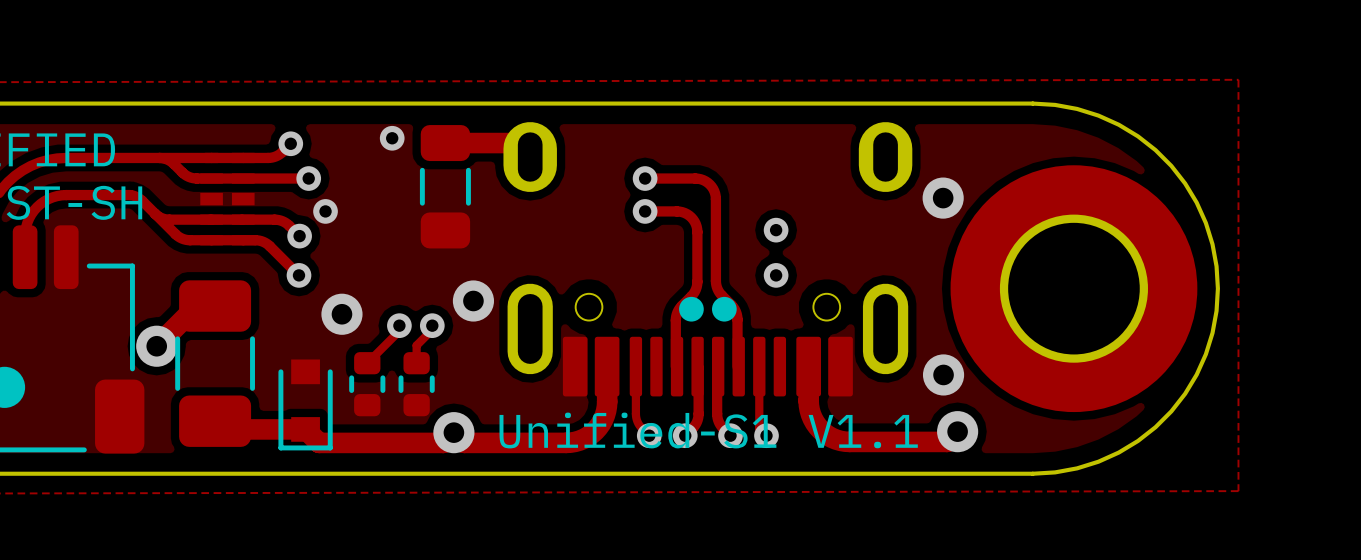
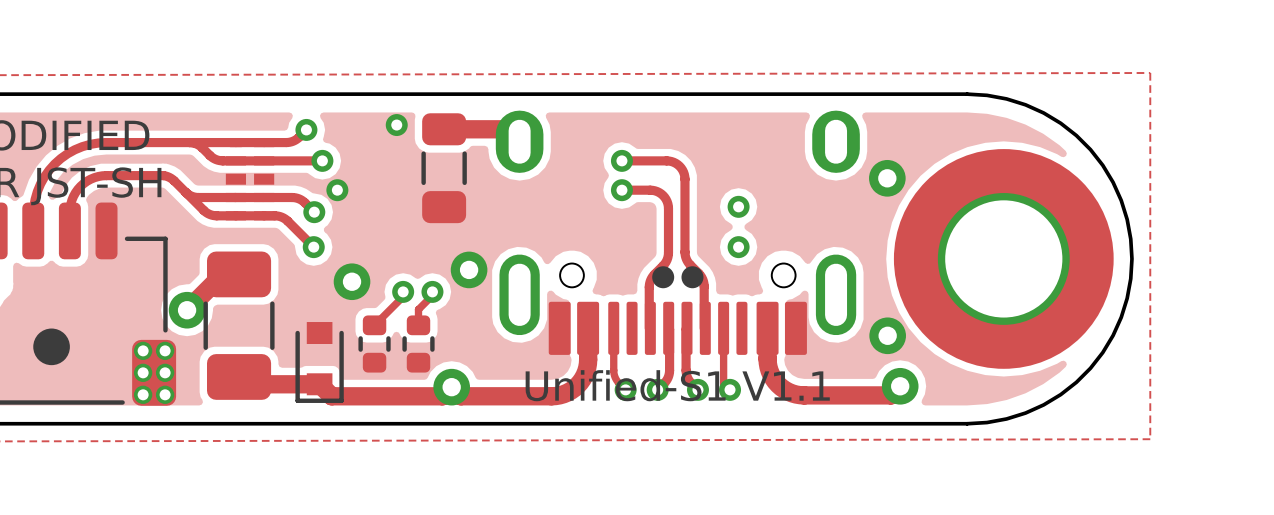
via: none -> (143, 350)
via: none -> (165, 350)
via: none -> (143, 372)
via: none -> (165, 372)
via: none -> (143, 394)
via: none -> (165, 394)

